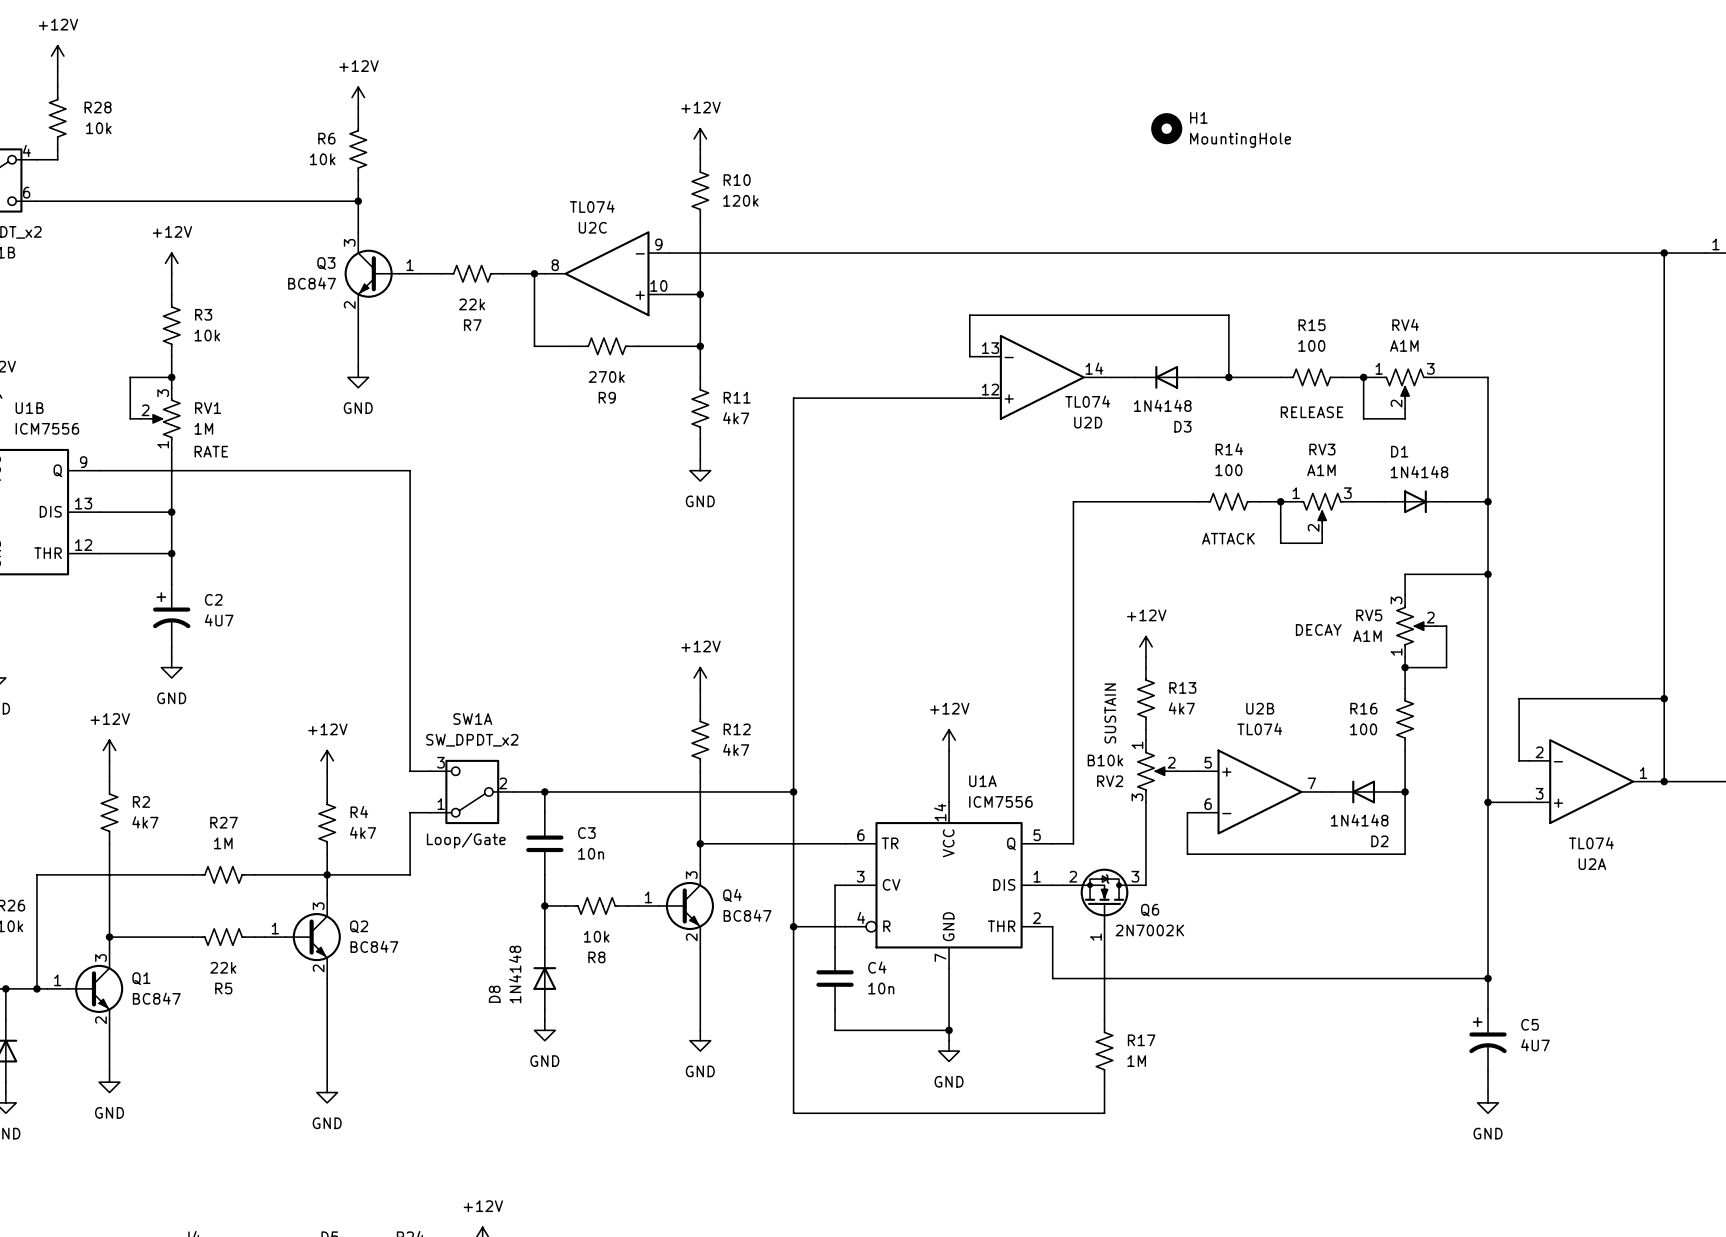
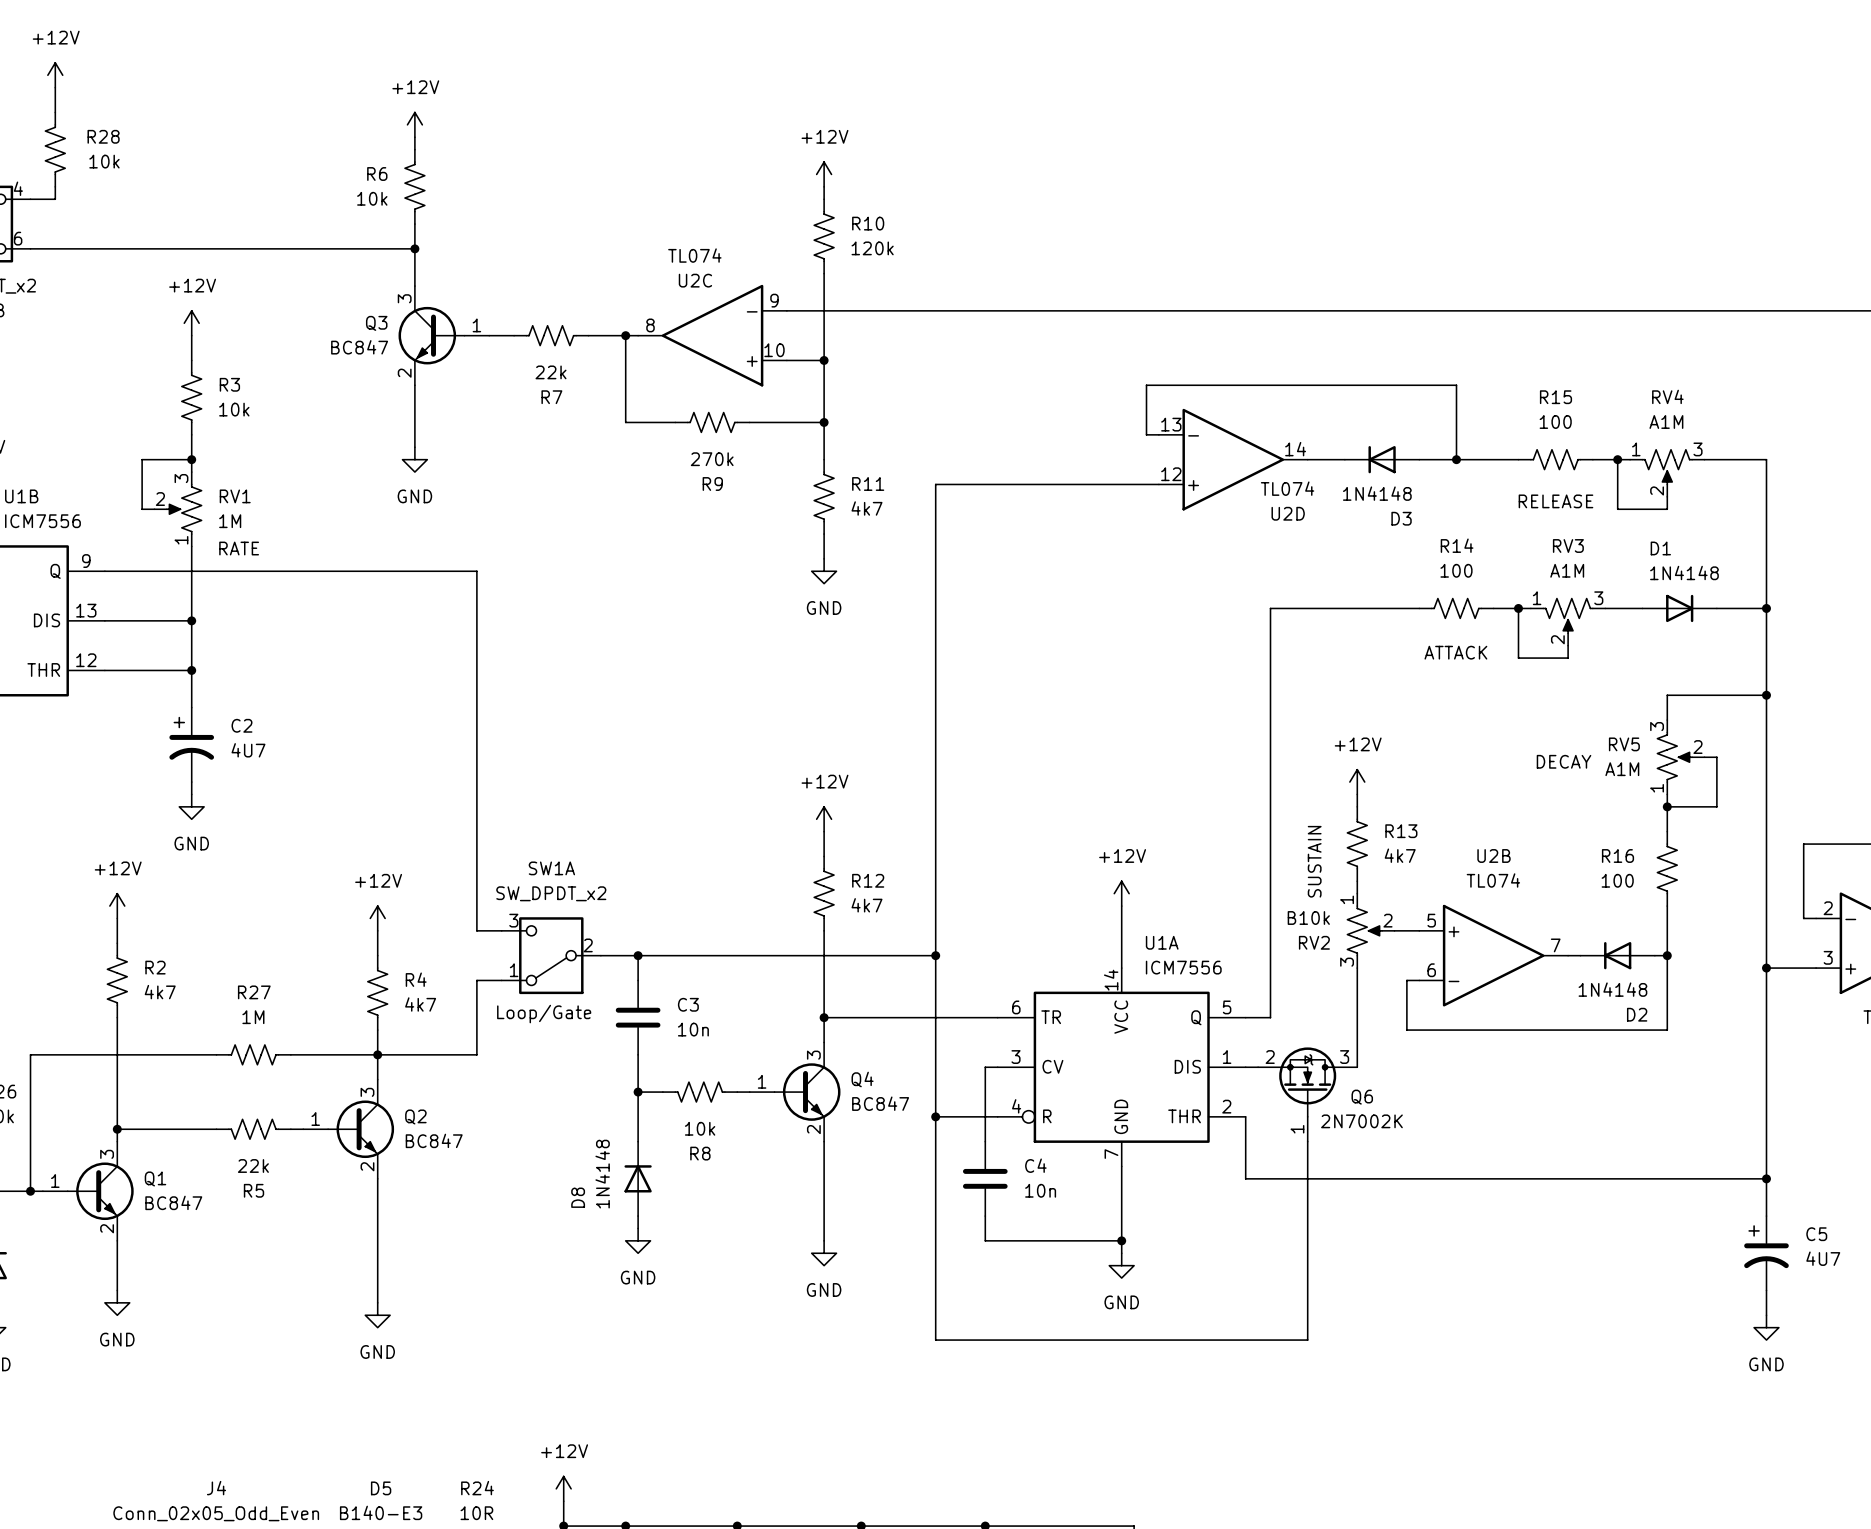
H1: MountingHole (1166, 128) -> none
R17: 1M (1104, 1051) -> none

